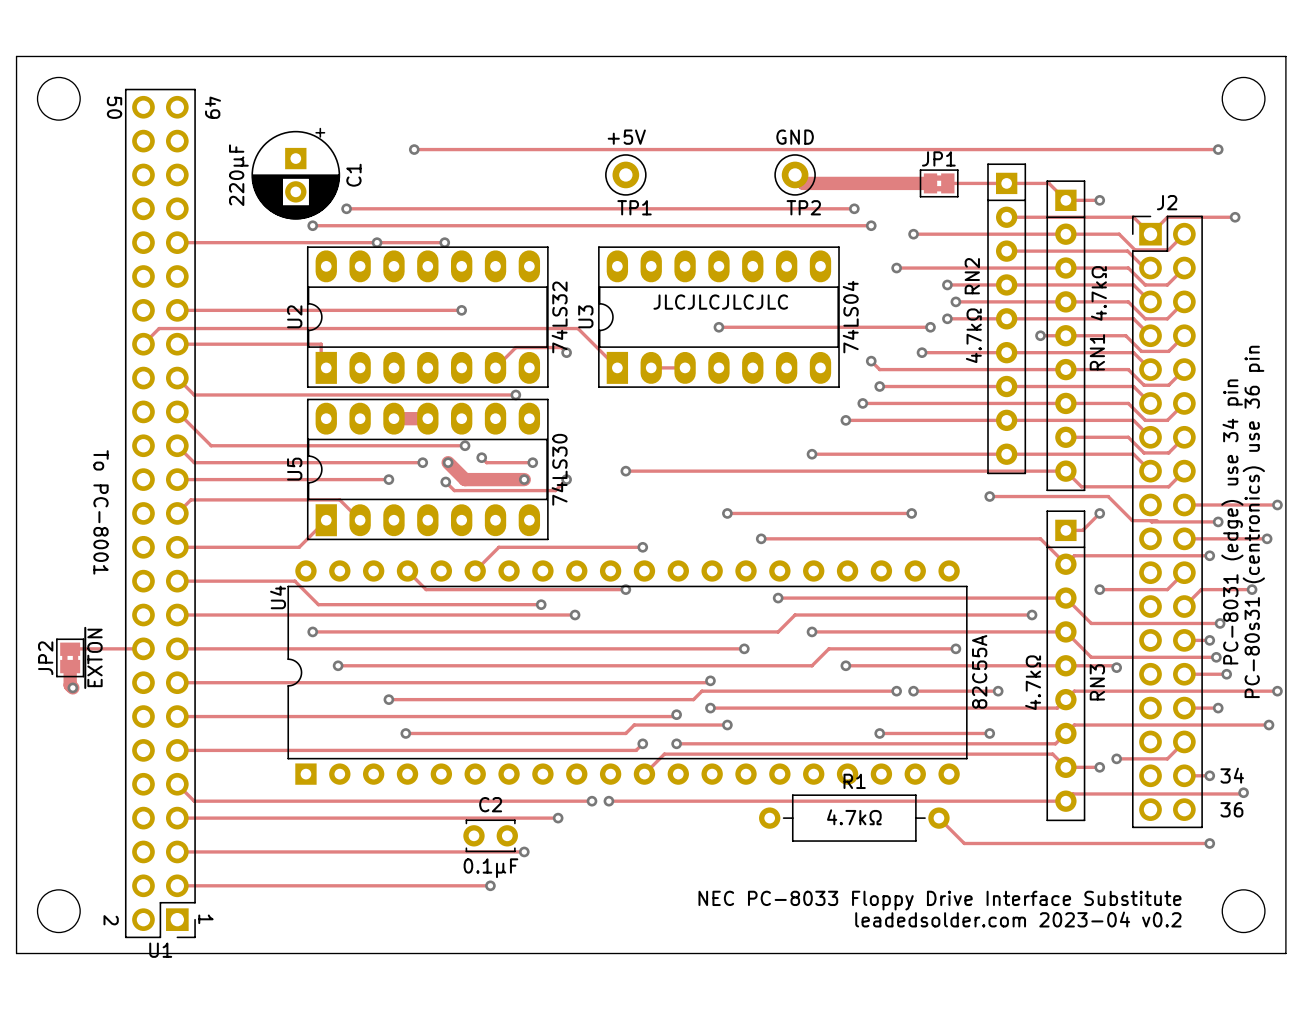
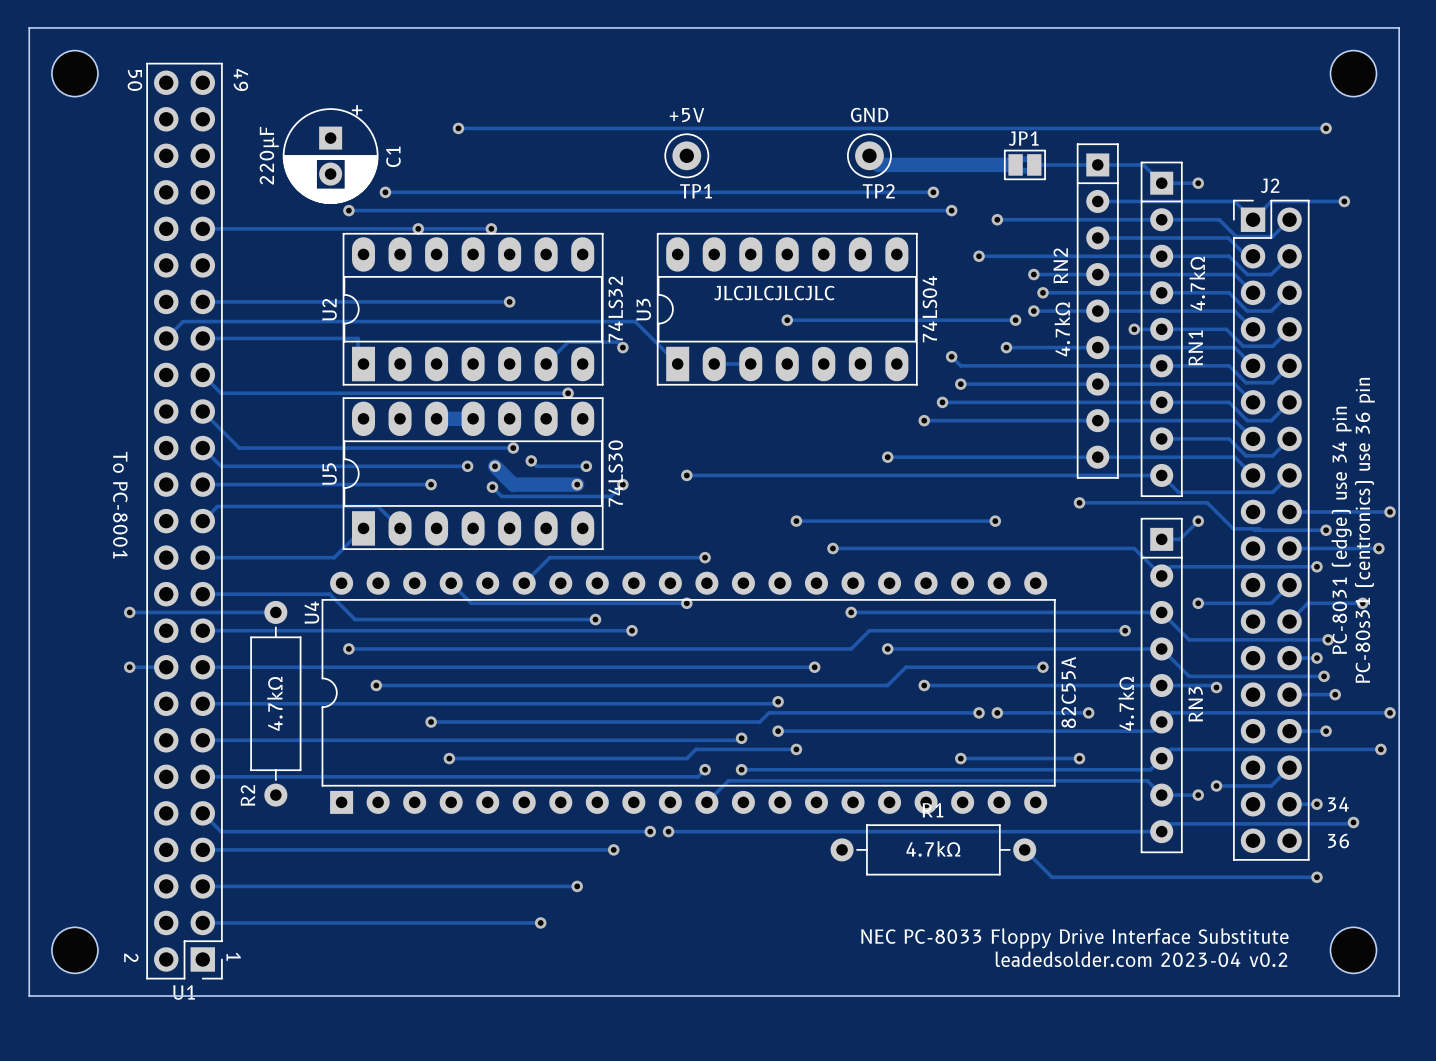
track: none -> (129, 612) (275, 612)
via: none -> (129, 612)
track: (109, 648) (70, 649) -> none
via: none -> (129, 667)
JP2: ~{EXTON} (70, 657) -> none
track: (70, 666) (70, 685) (72, 687) -> none
R2: none -> 4.7kΩ (275, 703)
via: (72, 687) -> none
C2: 0.1µF (490, 835) -> none

